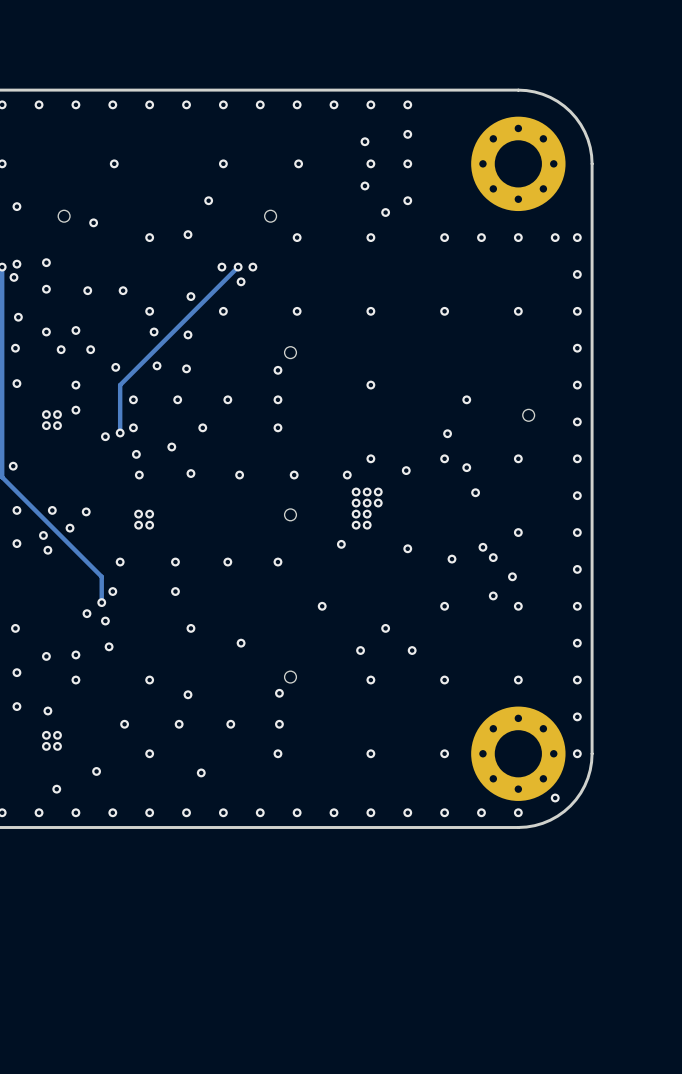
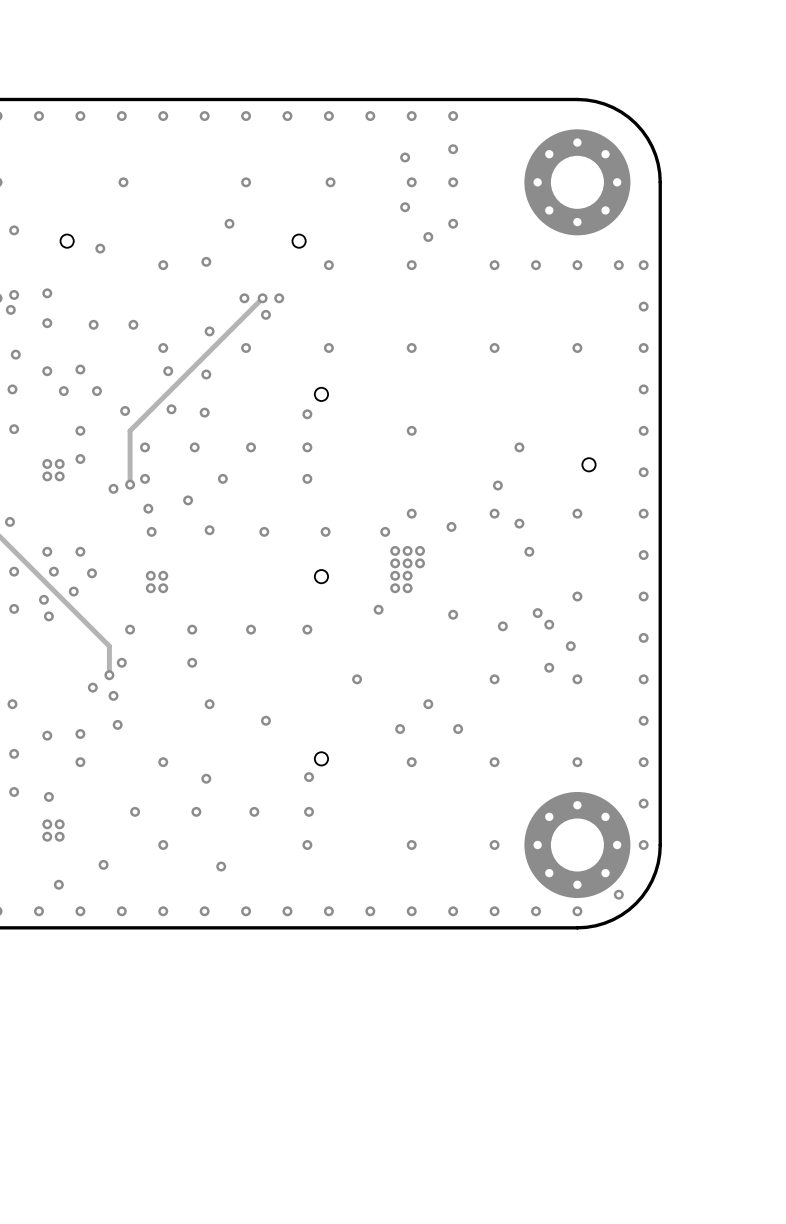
via: none -> (47, 551)
via: none -> (80, 551)

